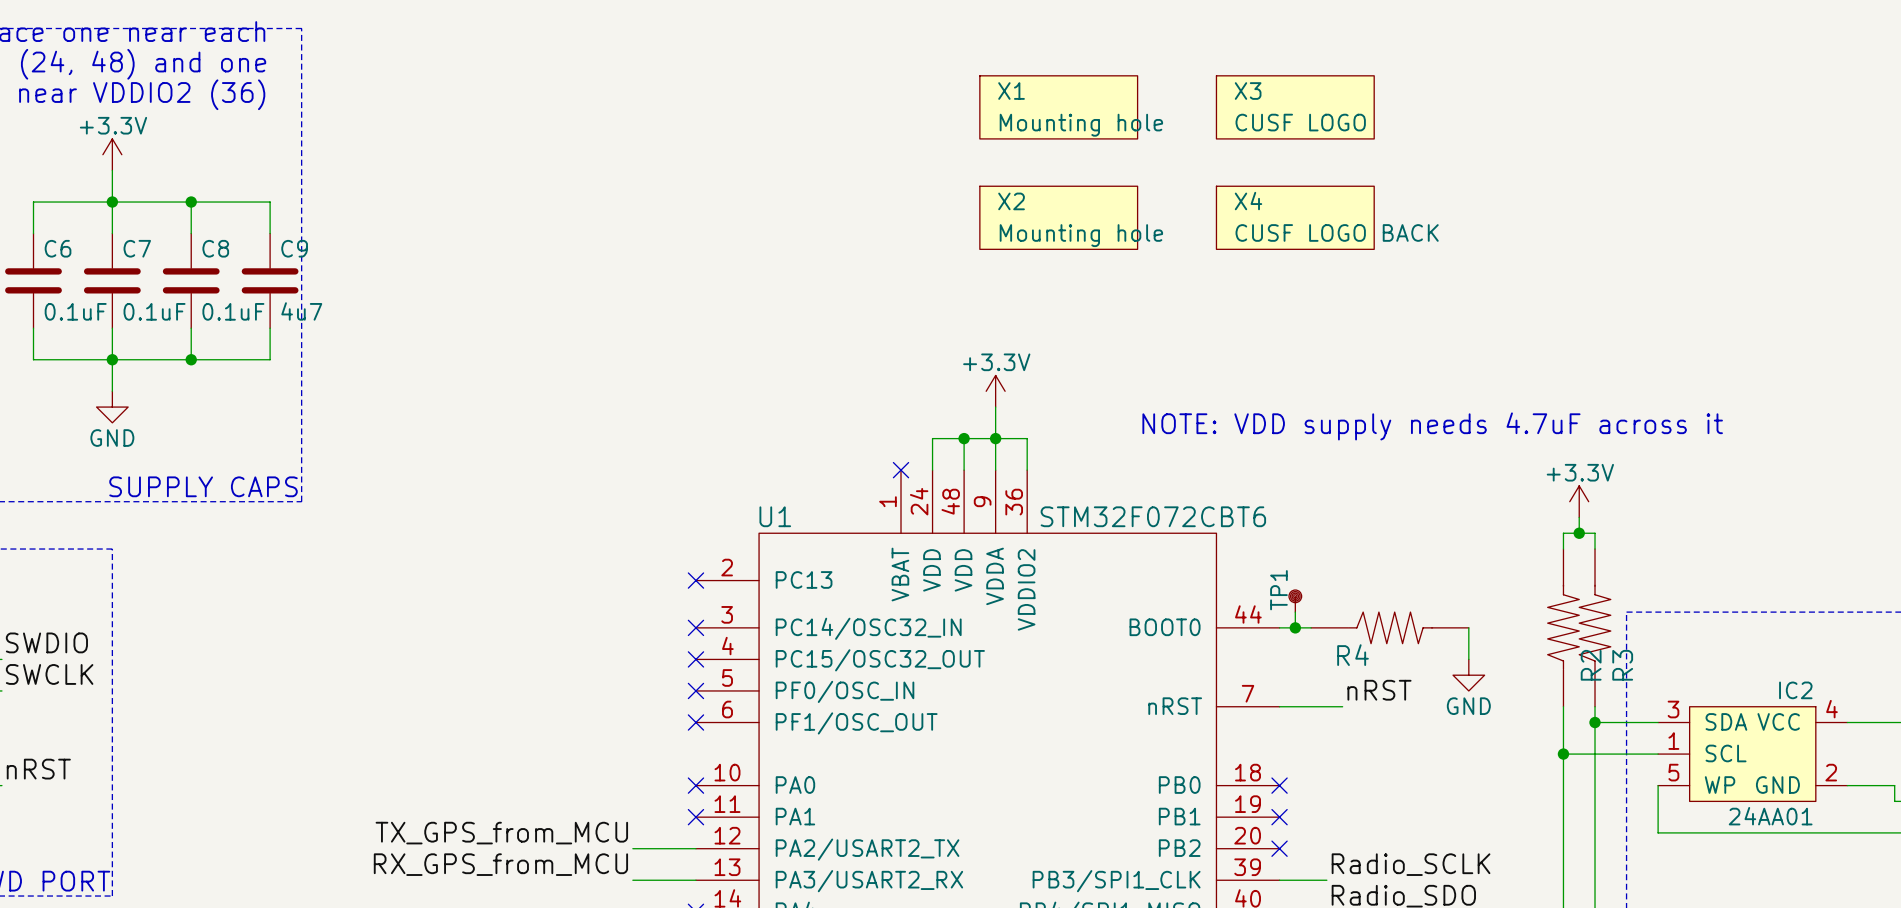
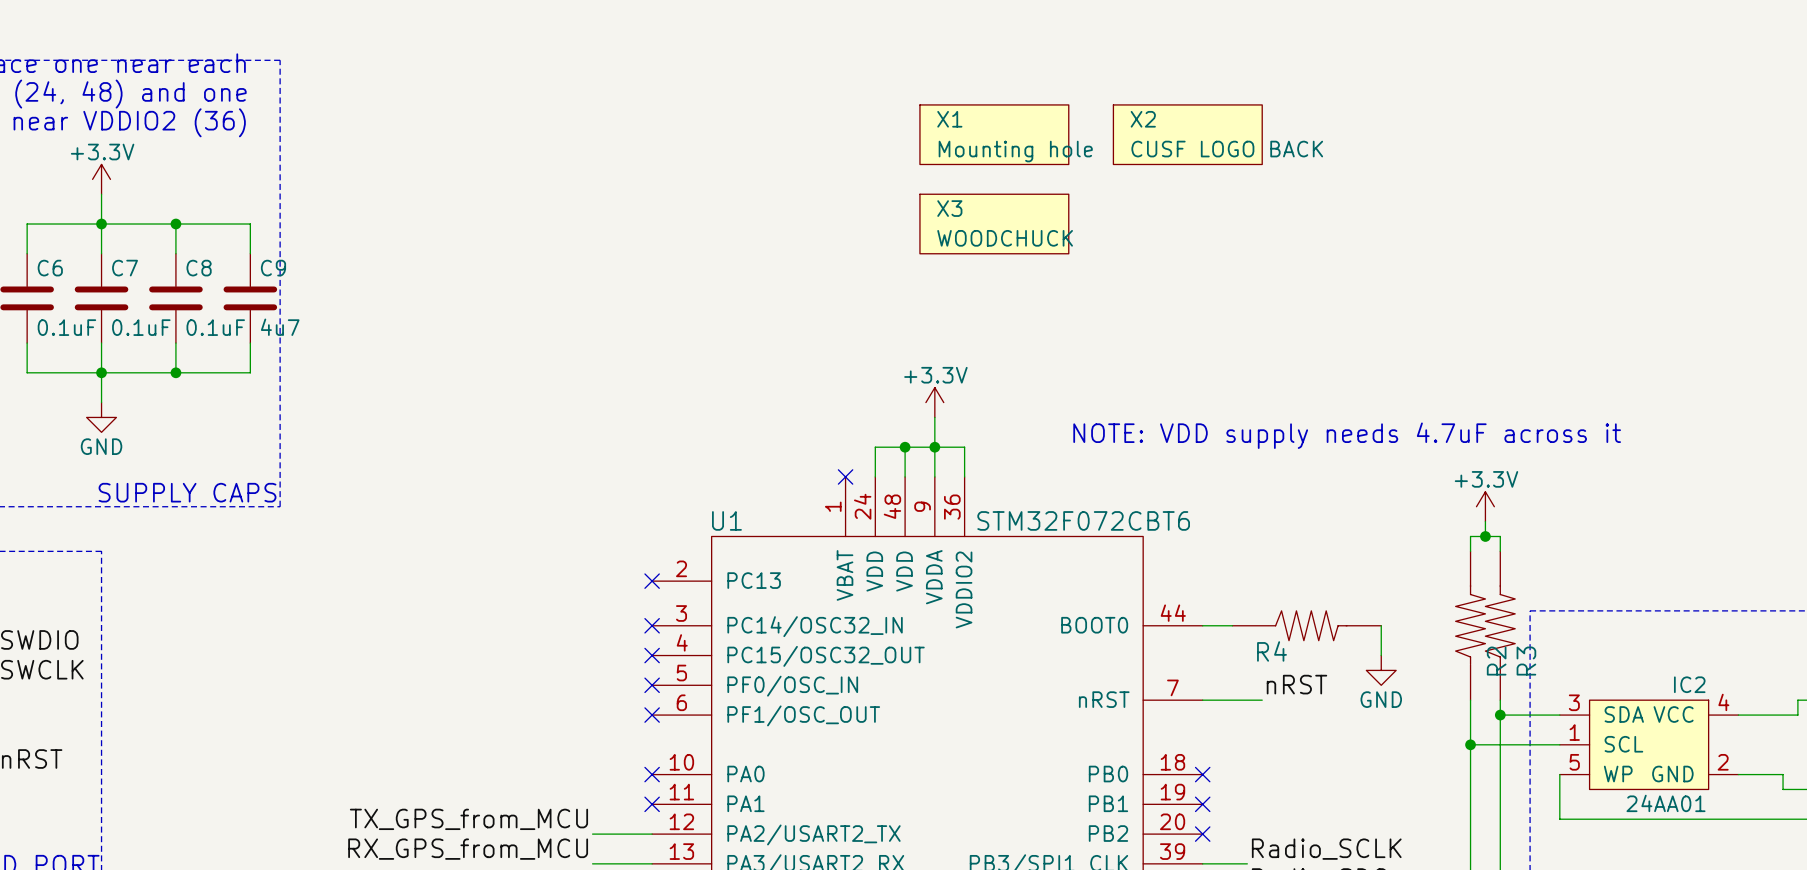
X3 position: (1295, 107) -> (994, 224)
X3 value: CUSF LOGO (1300, 122) -> WOODCHUCK (1005, 238)
X2 position: (1058, 217) -> (1187, 134)
X4: CUSF LOGO BACK (1295, 217) -> none
X2 value: Mounting hole (1081, 235) -> CUSF LOGO BACK (1227, 149)
TP1: (1295, 601) -> none
wire: (1295, 612) (1295, 627) -> none
junction: (1295, 627) -> none

